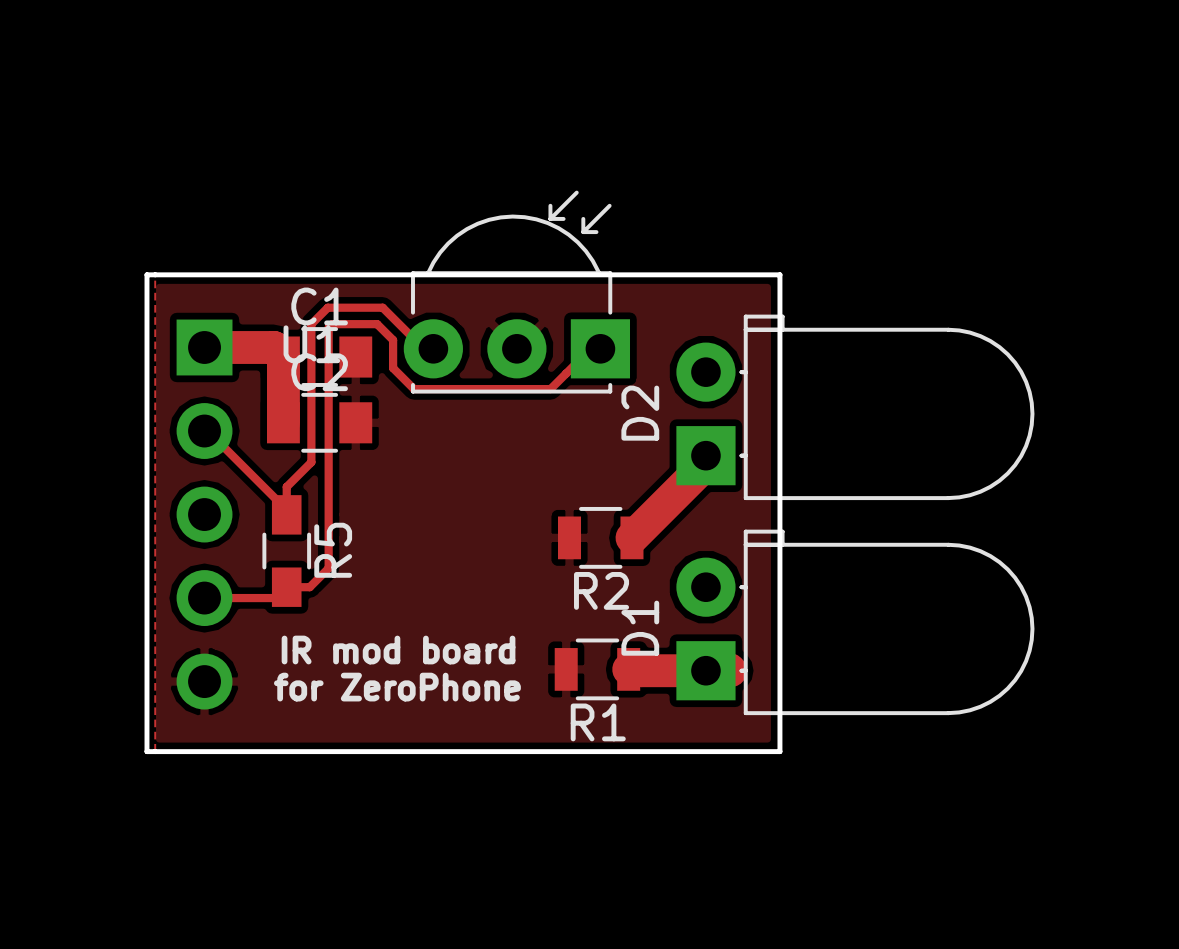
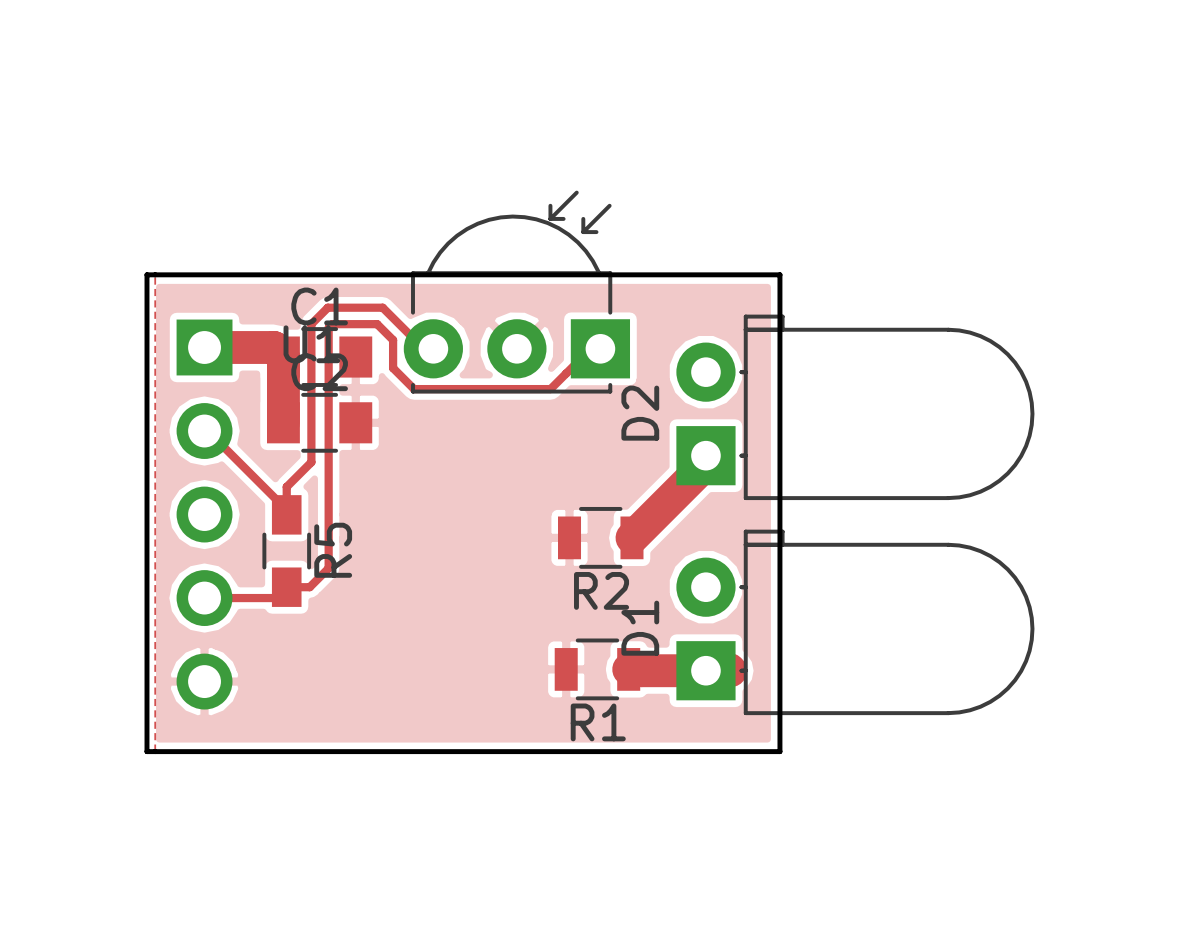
text: IR mod board (398, 650) -> none
text: for ZeroPhone (397, 687) -> none

